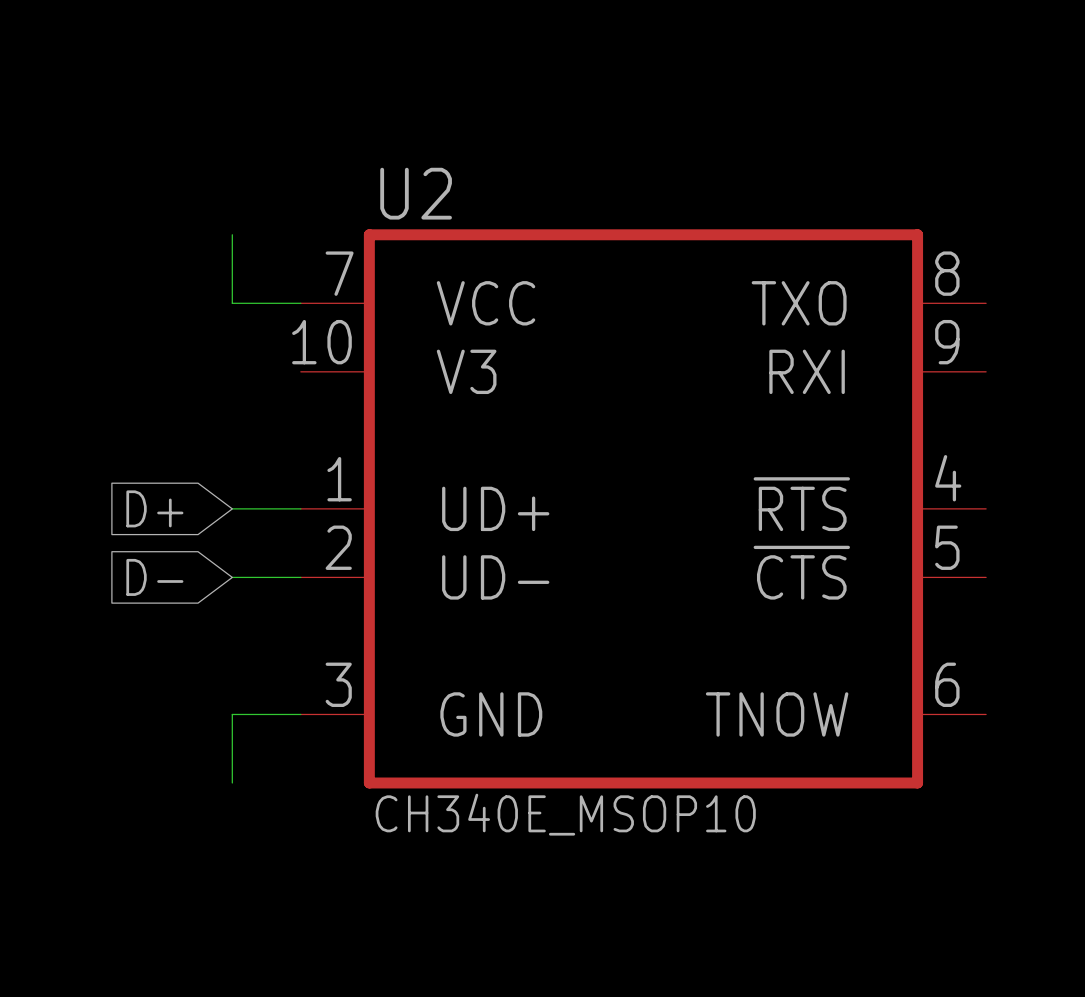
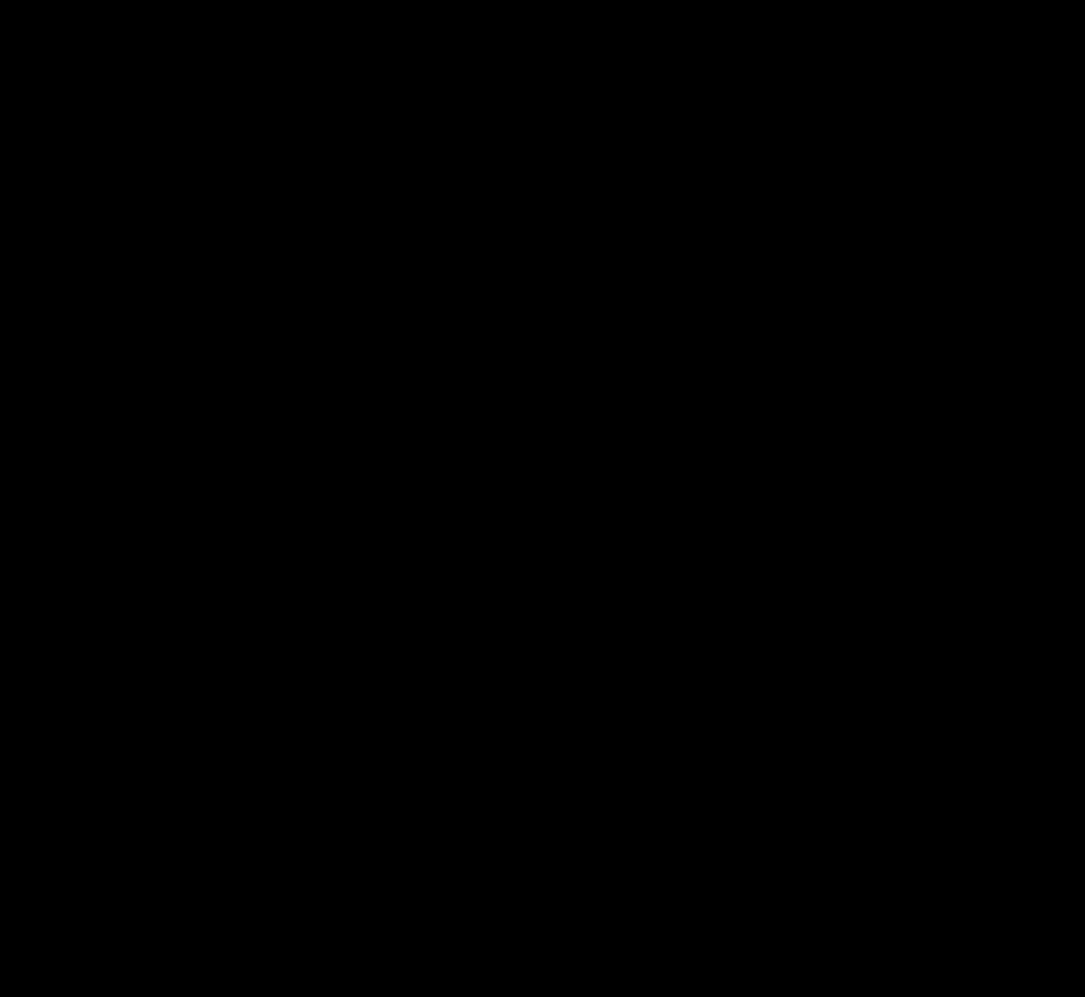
wire: (232, 234) (232, 303) (300, 303) -> none
global label: D+ (154, 508) -> none
wire: (232, 508) (300, 508) -> none
U2: CH340E_MSOP10 (643, 508) -> none
global label: D- (154, 577) -> none
wire: (232, 577) (300, 577) -> none
wire: (300, 714) (232, 714) (232, 782) -> none

